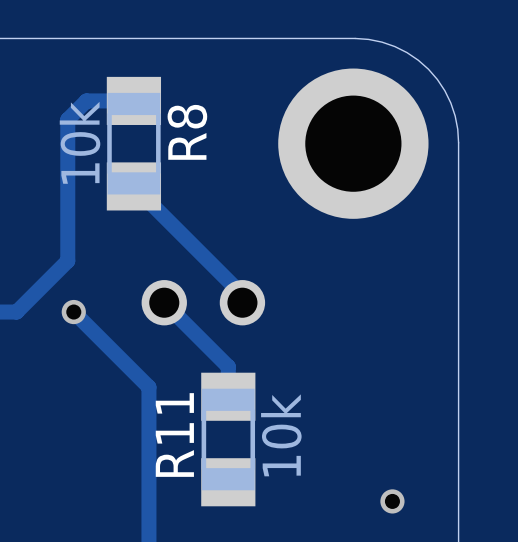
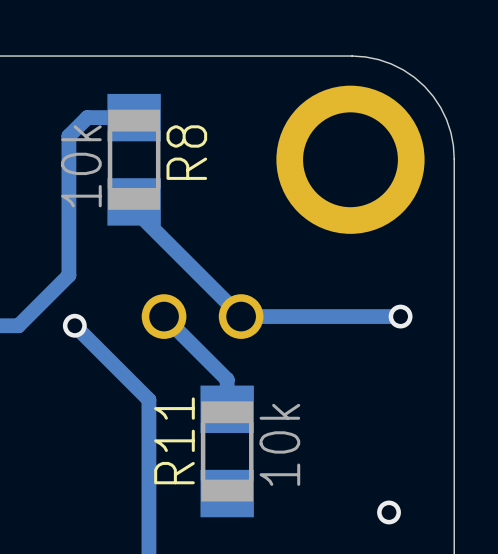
track: (133, 186) (242, 294) (242, 302) -> (134, 201) (134, 209) (241, 316) (400, 316)
via: none -> (400, 316)

